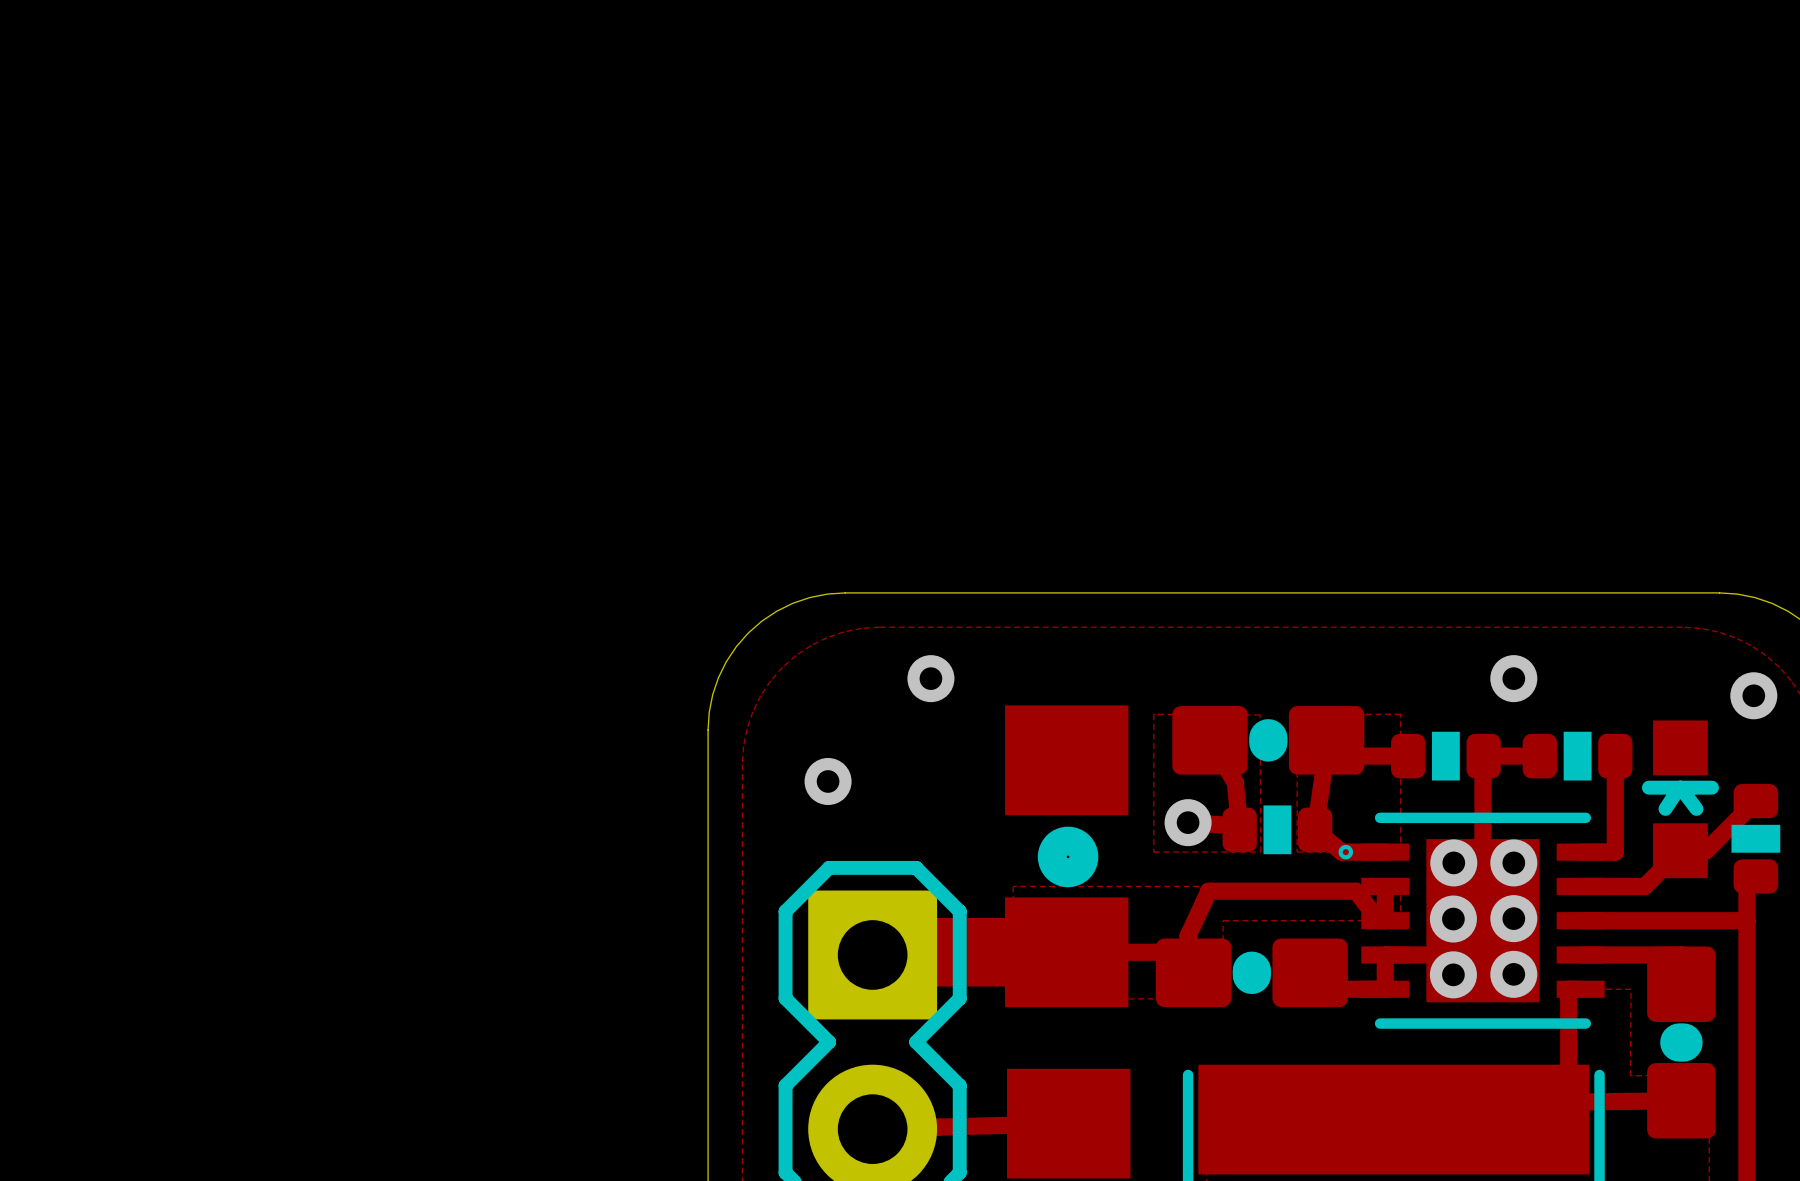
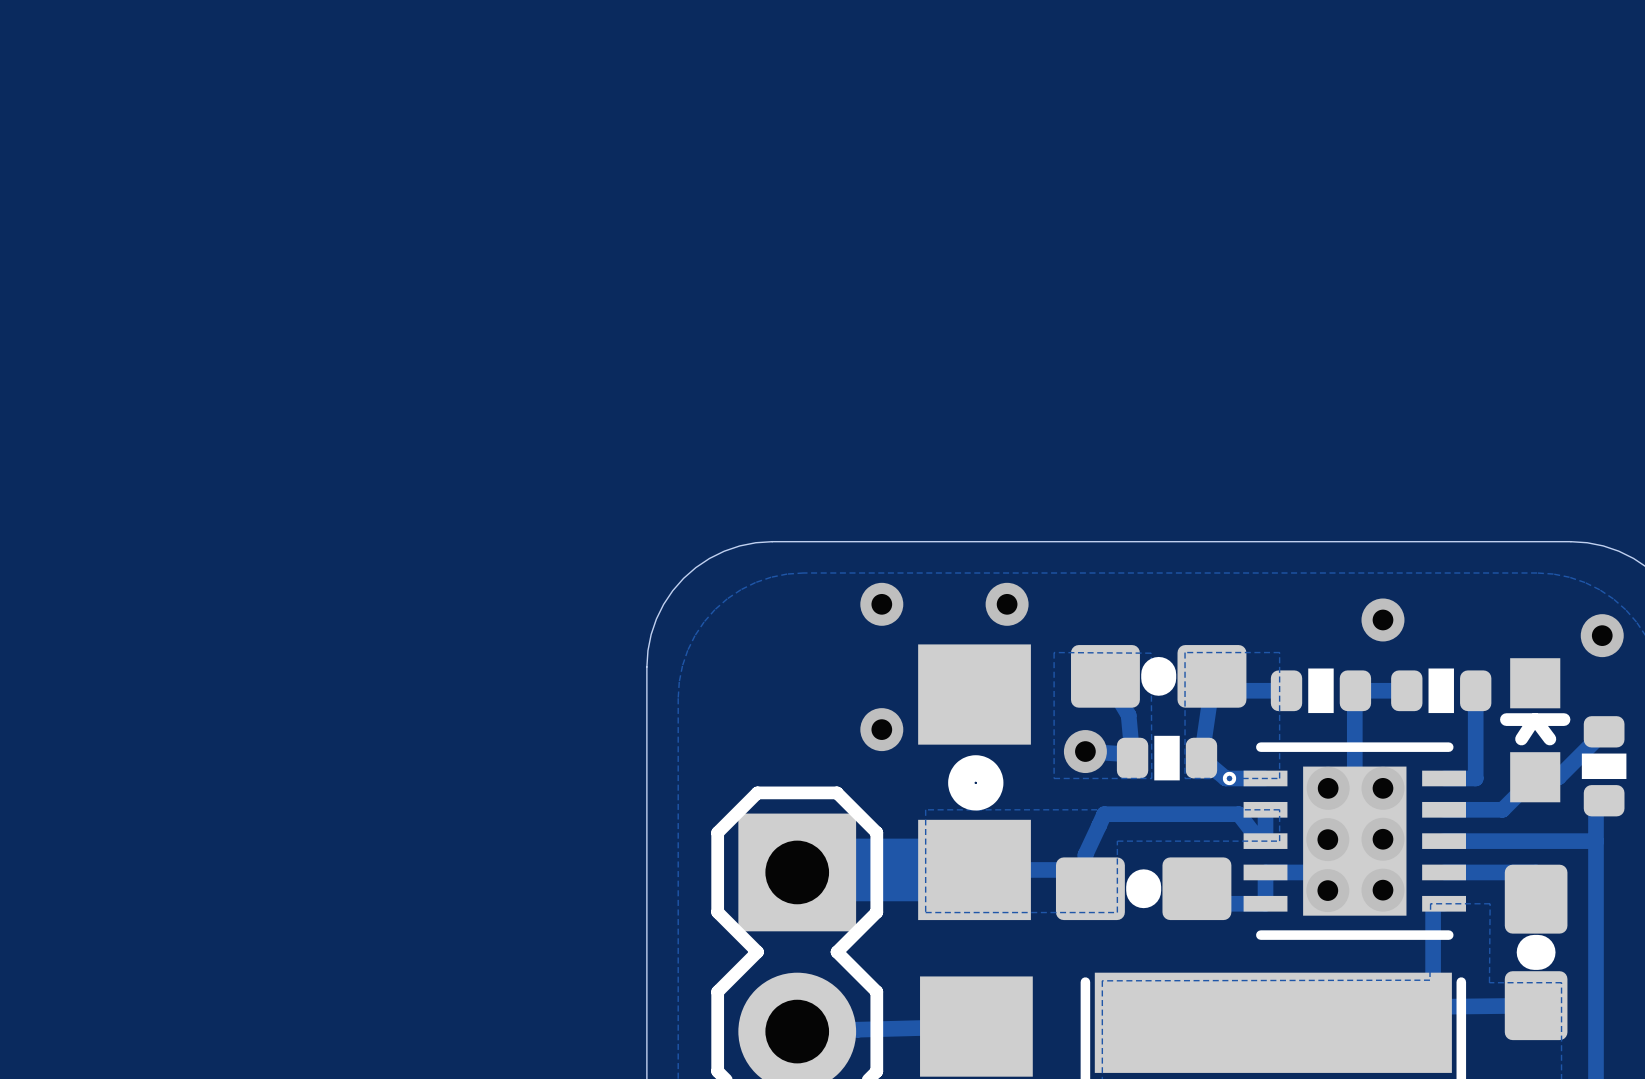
via: none -> (1007, 604)
via position: (930, 678) -> (881, 604)
via: (828, 781) -> none
via: none -> (881, 729)

